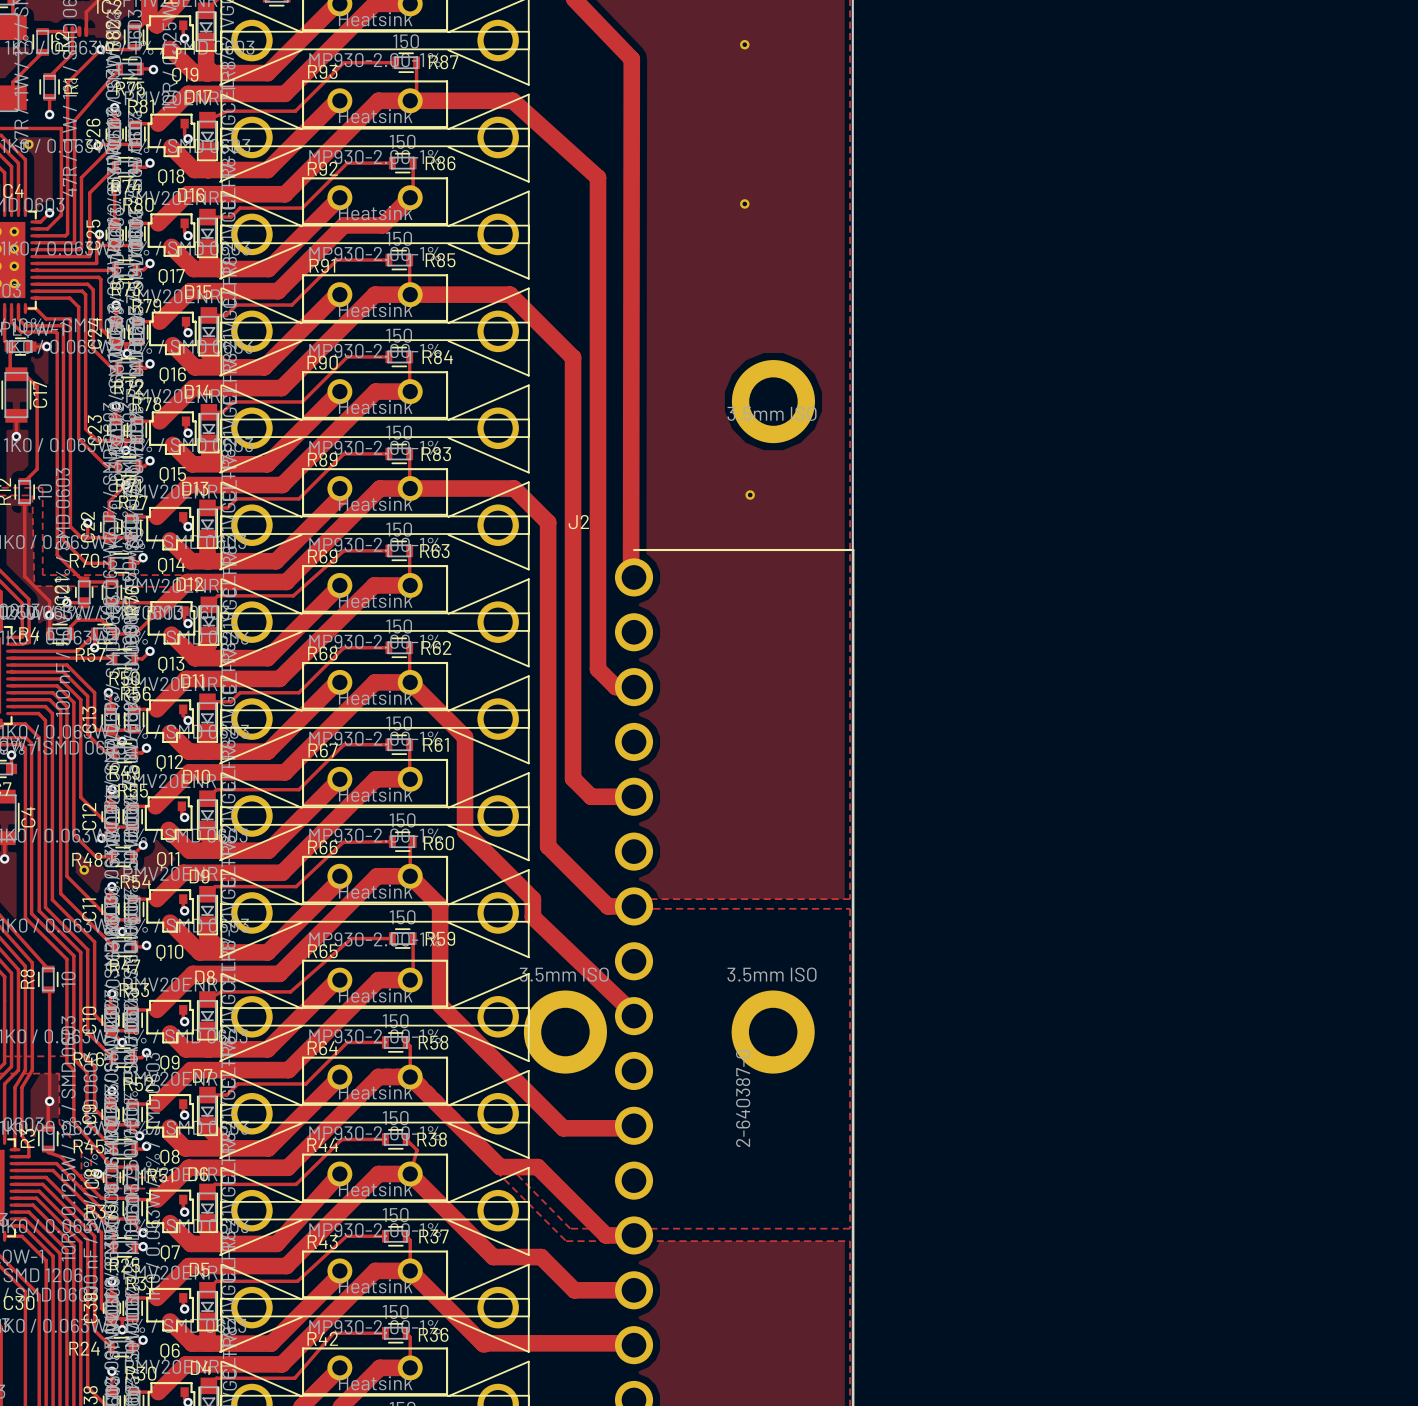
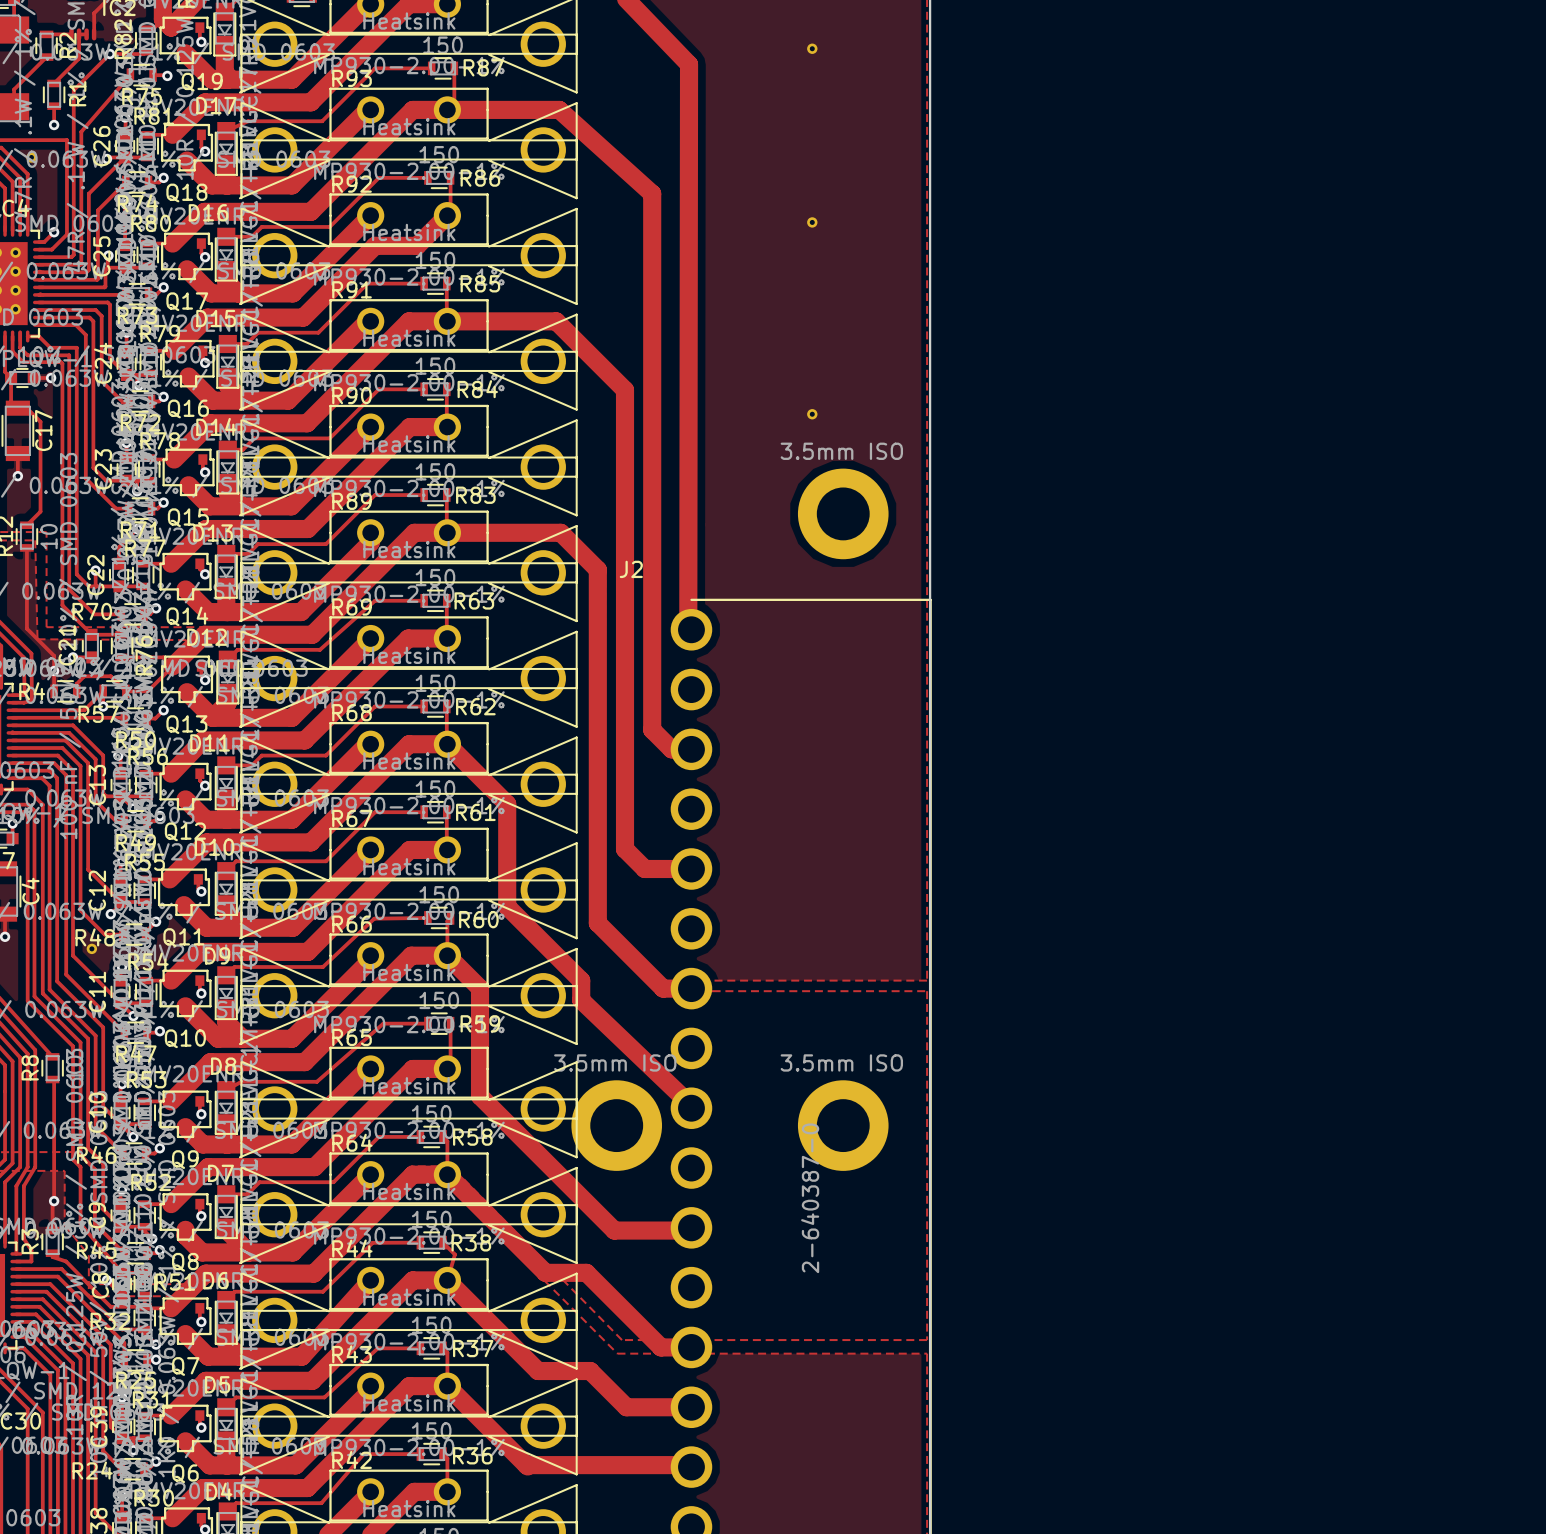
part position: (773, 401) -> (843, 513)
part position: (750, 495) -> (812, 414)

